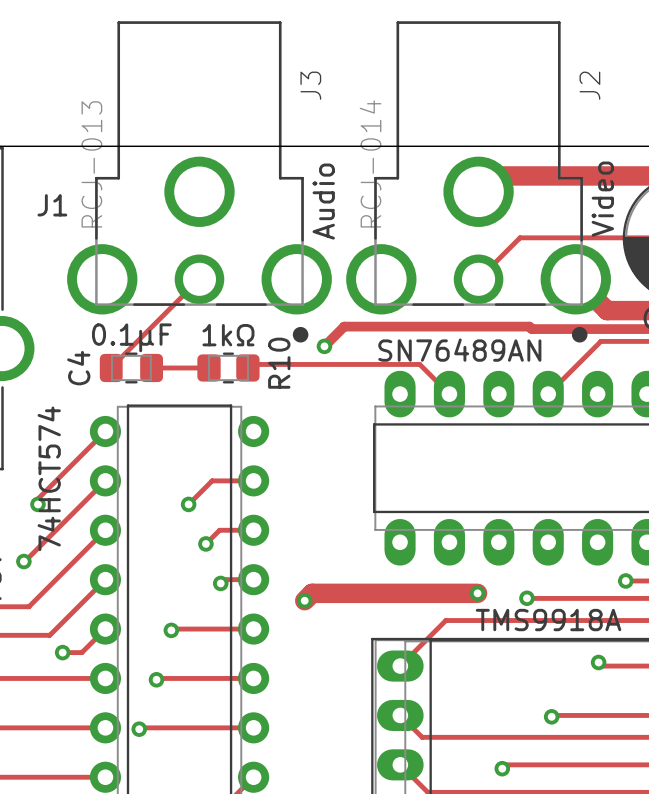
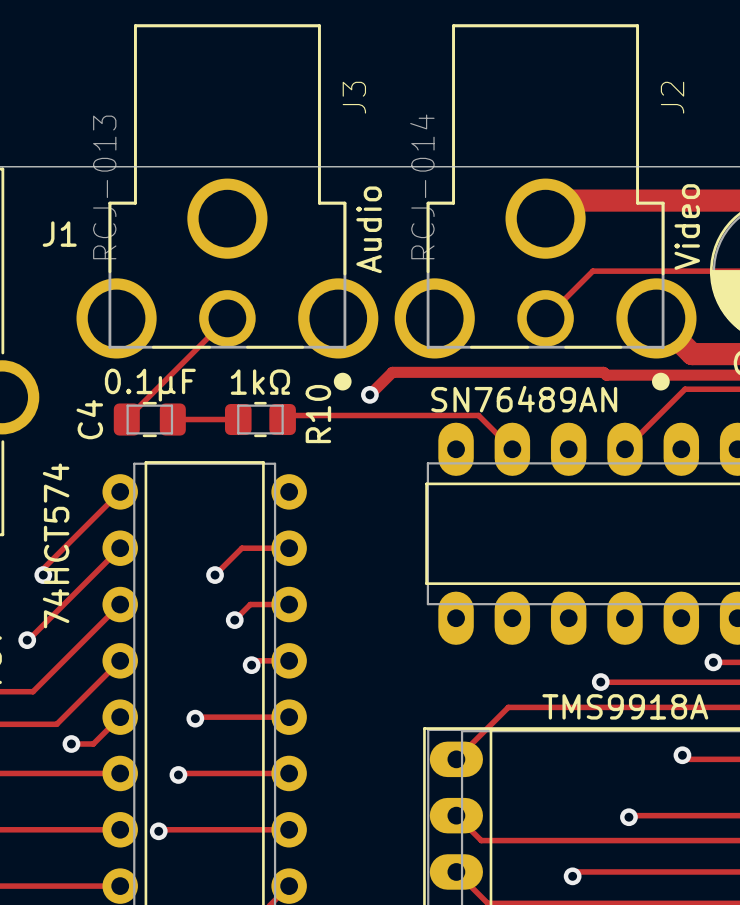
track: (477, 593) (312, 593) (304, 600) -> none
via: (477, 593) -> none
via: (304, 600) -> none

